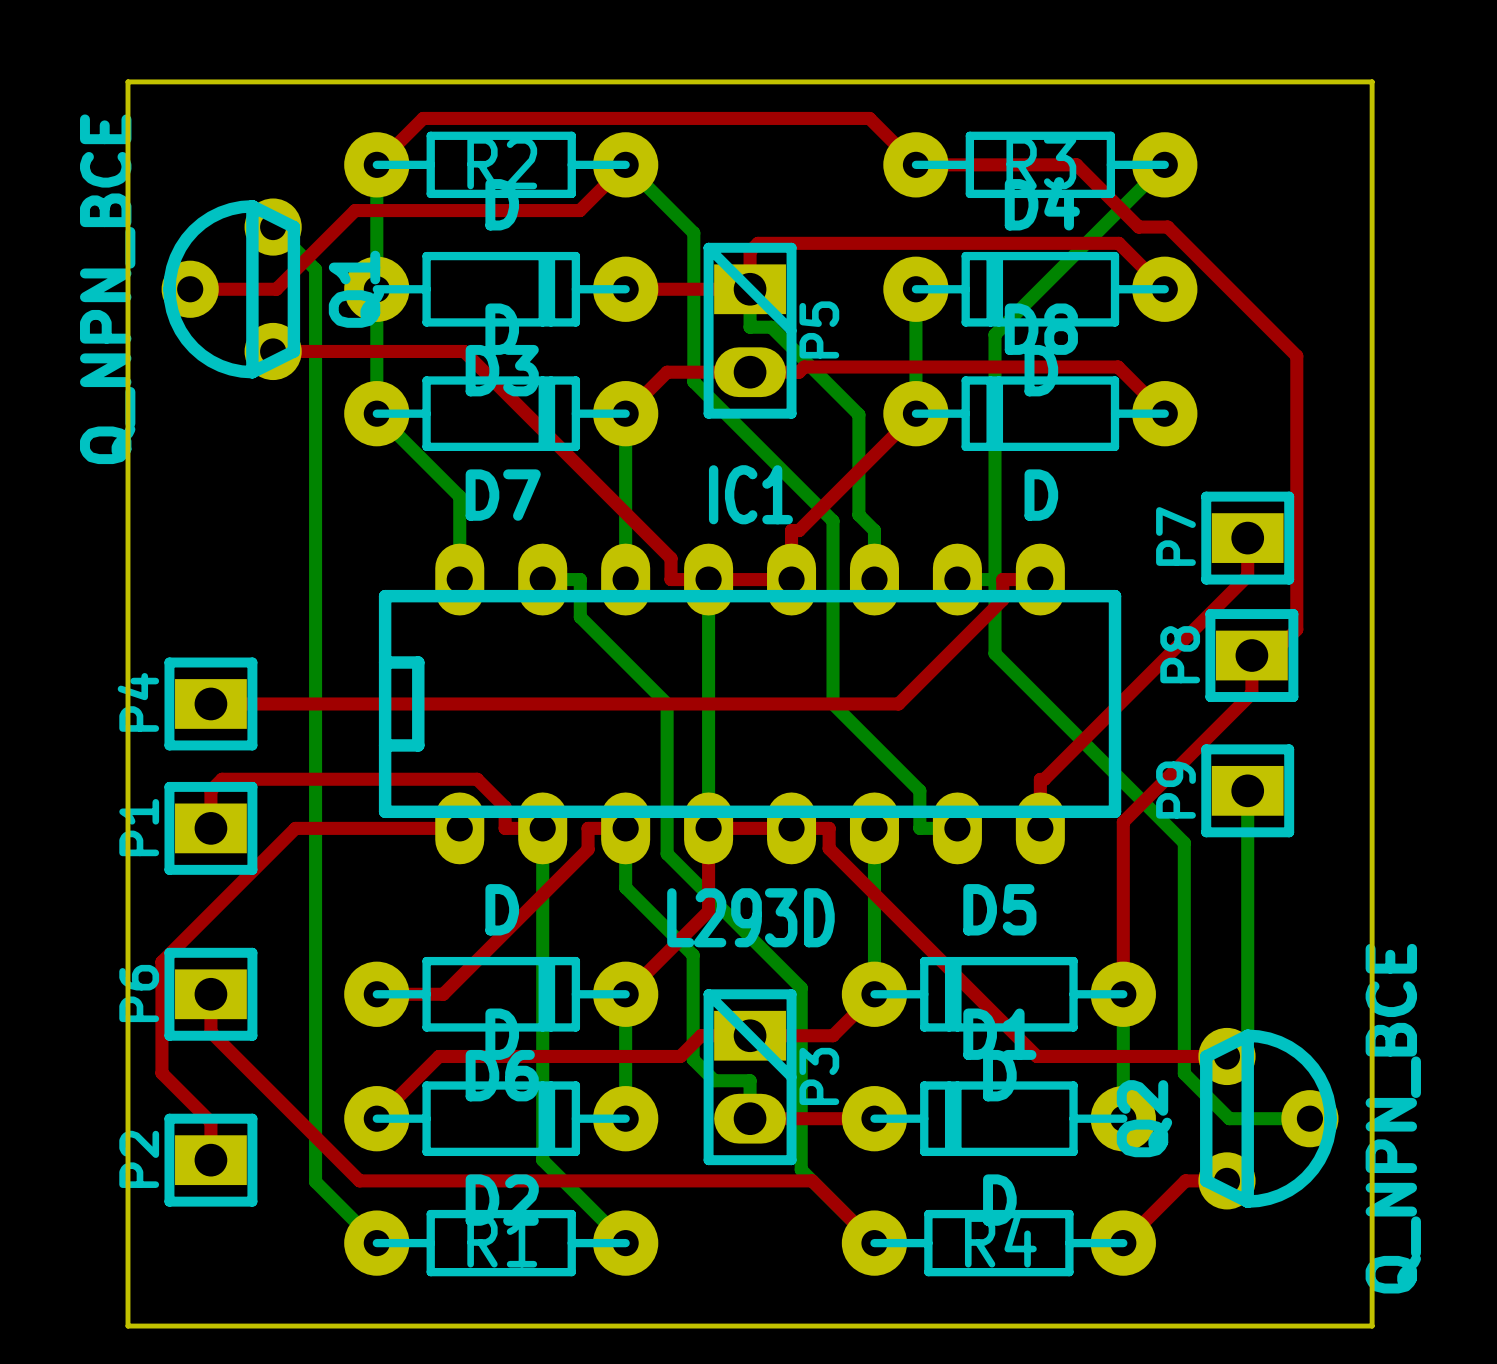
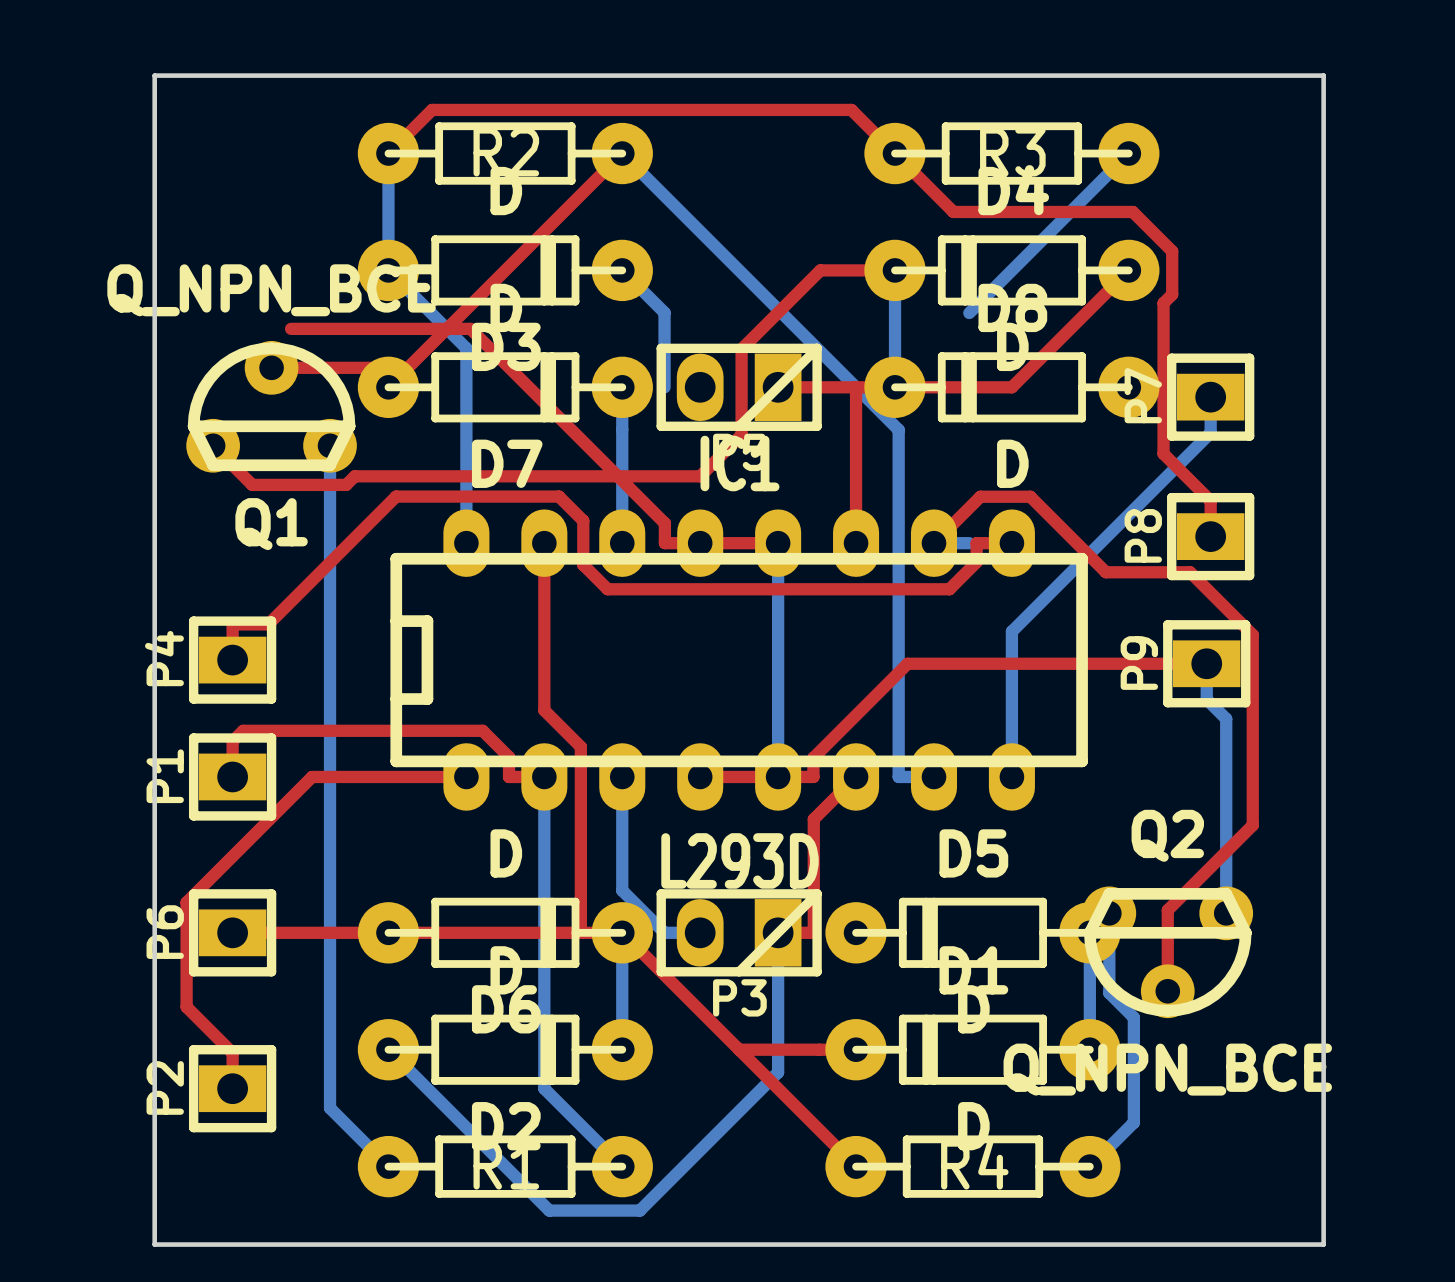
top track: (915, 164) (1076, 164) (1138, 227) -> (895, 153) (953, 211) (1104, 211)
top track: (579, 210) (355, 210) (276, 289) (190, 289) -> (579, 196) (407, 367) (271, 367)
bottom track: (273, 227) (315, 269) (315, 1181) -> (330, 445) (330, 1109)
top track: (1167, 227) (1296, 356) (1296, 629) (1251, 674) -> (1131, 211) (1172, 251) (1172, 294) (1163, 303) (1163, 453) (1210, 500) (1210, 536)
bottom track: (693, 233) (693, 381) (833, 521) (833, 703) (919, 790) -> (686, 217) (898, 429) (898, 741)
Q1 rotation: 0° (231, 289) -> 90° clockwise (271, 406)
Q1 position: (231, 289) -> (271, 406)
bottom track: (376, 289) (376, 413) (459, 496) -> (388, 270) (466, 348) (466, 465)
bottom track: none -> (622, 270) (664, 312) (664, 387)
top track: (625, 289) (750, 289) (750, 251) (758, 243) (1118, 243) (1164, 289) -> (778, 387) (1011, 387) (1128, 270)
bottom track: (750, 289) (750, 327) (771, 327) (858, 414) (858, 515) (874, 530) (874, 579) -> none
top track: none -> (895, 270) (820, 270) (741, 349) (741, 434) (700, 476) (354, 476) (346, 484) (252, 484) (213, 445)
P5 rotation: 0° (750, 330) -> 90° clockwise (739, 387)
bottom track: (995, 334) (995, 653) (1184, 842) (1184, 1073) (1229, 1118) (1309, 1118) -> none
top track: (625, 413) (667, 372) (799, 372) (804, 367) (1118, 367) (1164, 413) -> none
top track: none -> (856, 387) (856, 543)
top track: (915, 413) (799, 530) (791, 530) (791, 579) -> none
bottom track: none -> (1210, 397) (1210, 432) (1011, 631) (1011, 776)
top track: (1247, 538) (1247, 576) (1044, 779) (1040, 779) (1040, 828) -> none
P7 position: (1247, 538) -> (1210, 397)
bottom track: (542, 579) (580, 579) (580, 617) (667, 703) (667, 853) (801, 987) (801, 1169) (874, 1243) -> none
top track: none -> (544, 543) (544, 710) (580, 746) (580, 932)
bottom track: (708, 579) (708, 828) -> (778, 543) (778, 776)
top track: none -> (933, 543) (980, 496) (1030, 496) (1105, 572) (1190, 572) (1252, 634) (1252, 825) (1167, 910) (1167, 991)
top track: (973, 628) (898, 703) (210, 703) -> (949, 589) (607, 589) (583, 564) (583, 520) (559, 496) (396, 496) (268, 624) (232, 624) (232, 660)
top track: (1251, 655) (1251, 693) (1123, 822) (1123, 994) -> none
P8 position: (1251, 655) -> (1210, 536)
bottom track: none -> (1206, 663) (1206, 699) (1226, 718) (1226, 913)
bottom track: (1247, 790) (1247, 1035) (1226, 1056) -> none
P9 position: (1247, 790) -> (1206, 663)
top track: (625, 828) (588, 828) (588, 849) (443, 994) -> none
top track: (708, 828) (708, 911) (625, 994) -> none
top track: (829, 828) (829, 848) (1036, 1056) (1226, 1056) -> (813, 776) (813, 757) (907, 663) (1206, 663)
bottom track: (874, 828) (874, 994) -> none
top track: none -> (856, 776) (813, 819) (813, 932) (778, 932)
bottom track: (625, 887) (693, 955) (693, 1059) (714, 1080) (750, 1080) (750, 1118) -> (622, 832) (622, 890) (664, 932) (700, 932)
bottom track: none -> (1109, 913) (1109, 993) (1133, 1017) (1133, 1122) (1089, 1166)
top track: (210, 994) (210, 1032) (359, 1180) (812, 1180) -> (450, 932) (622, 932) (797, 1108)
top track: none -> (232, 932) (388, 932)
bottom track: none -> (778, 932) (778, 1072) (639, 1210) (549, 1210) (388, 1049)
top track: (874, 994) (833, 1035) (701, 1035) (680, 1056) (439, 1056) (376, 1118) -> none
P3 rotation: 0° (750, 1077) -> 90° clockwise (739, 932)
Q2 rotation: 0° (1268, 1118) -> 90° clockwise (1167, 952)
Q2 position: (1268, 1118) -> (1167, 952)
top track: (1226, 1180) (1185, 1180) (1123, 1243) -> none

